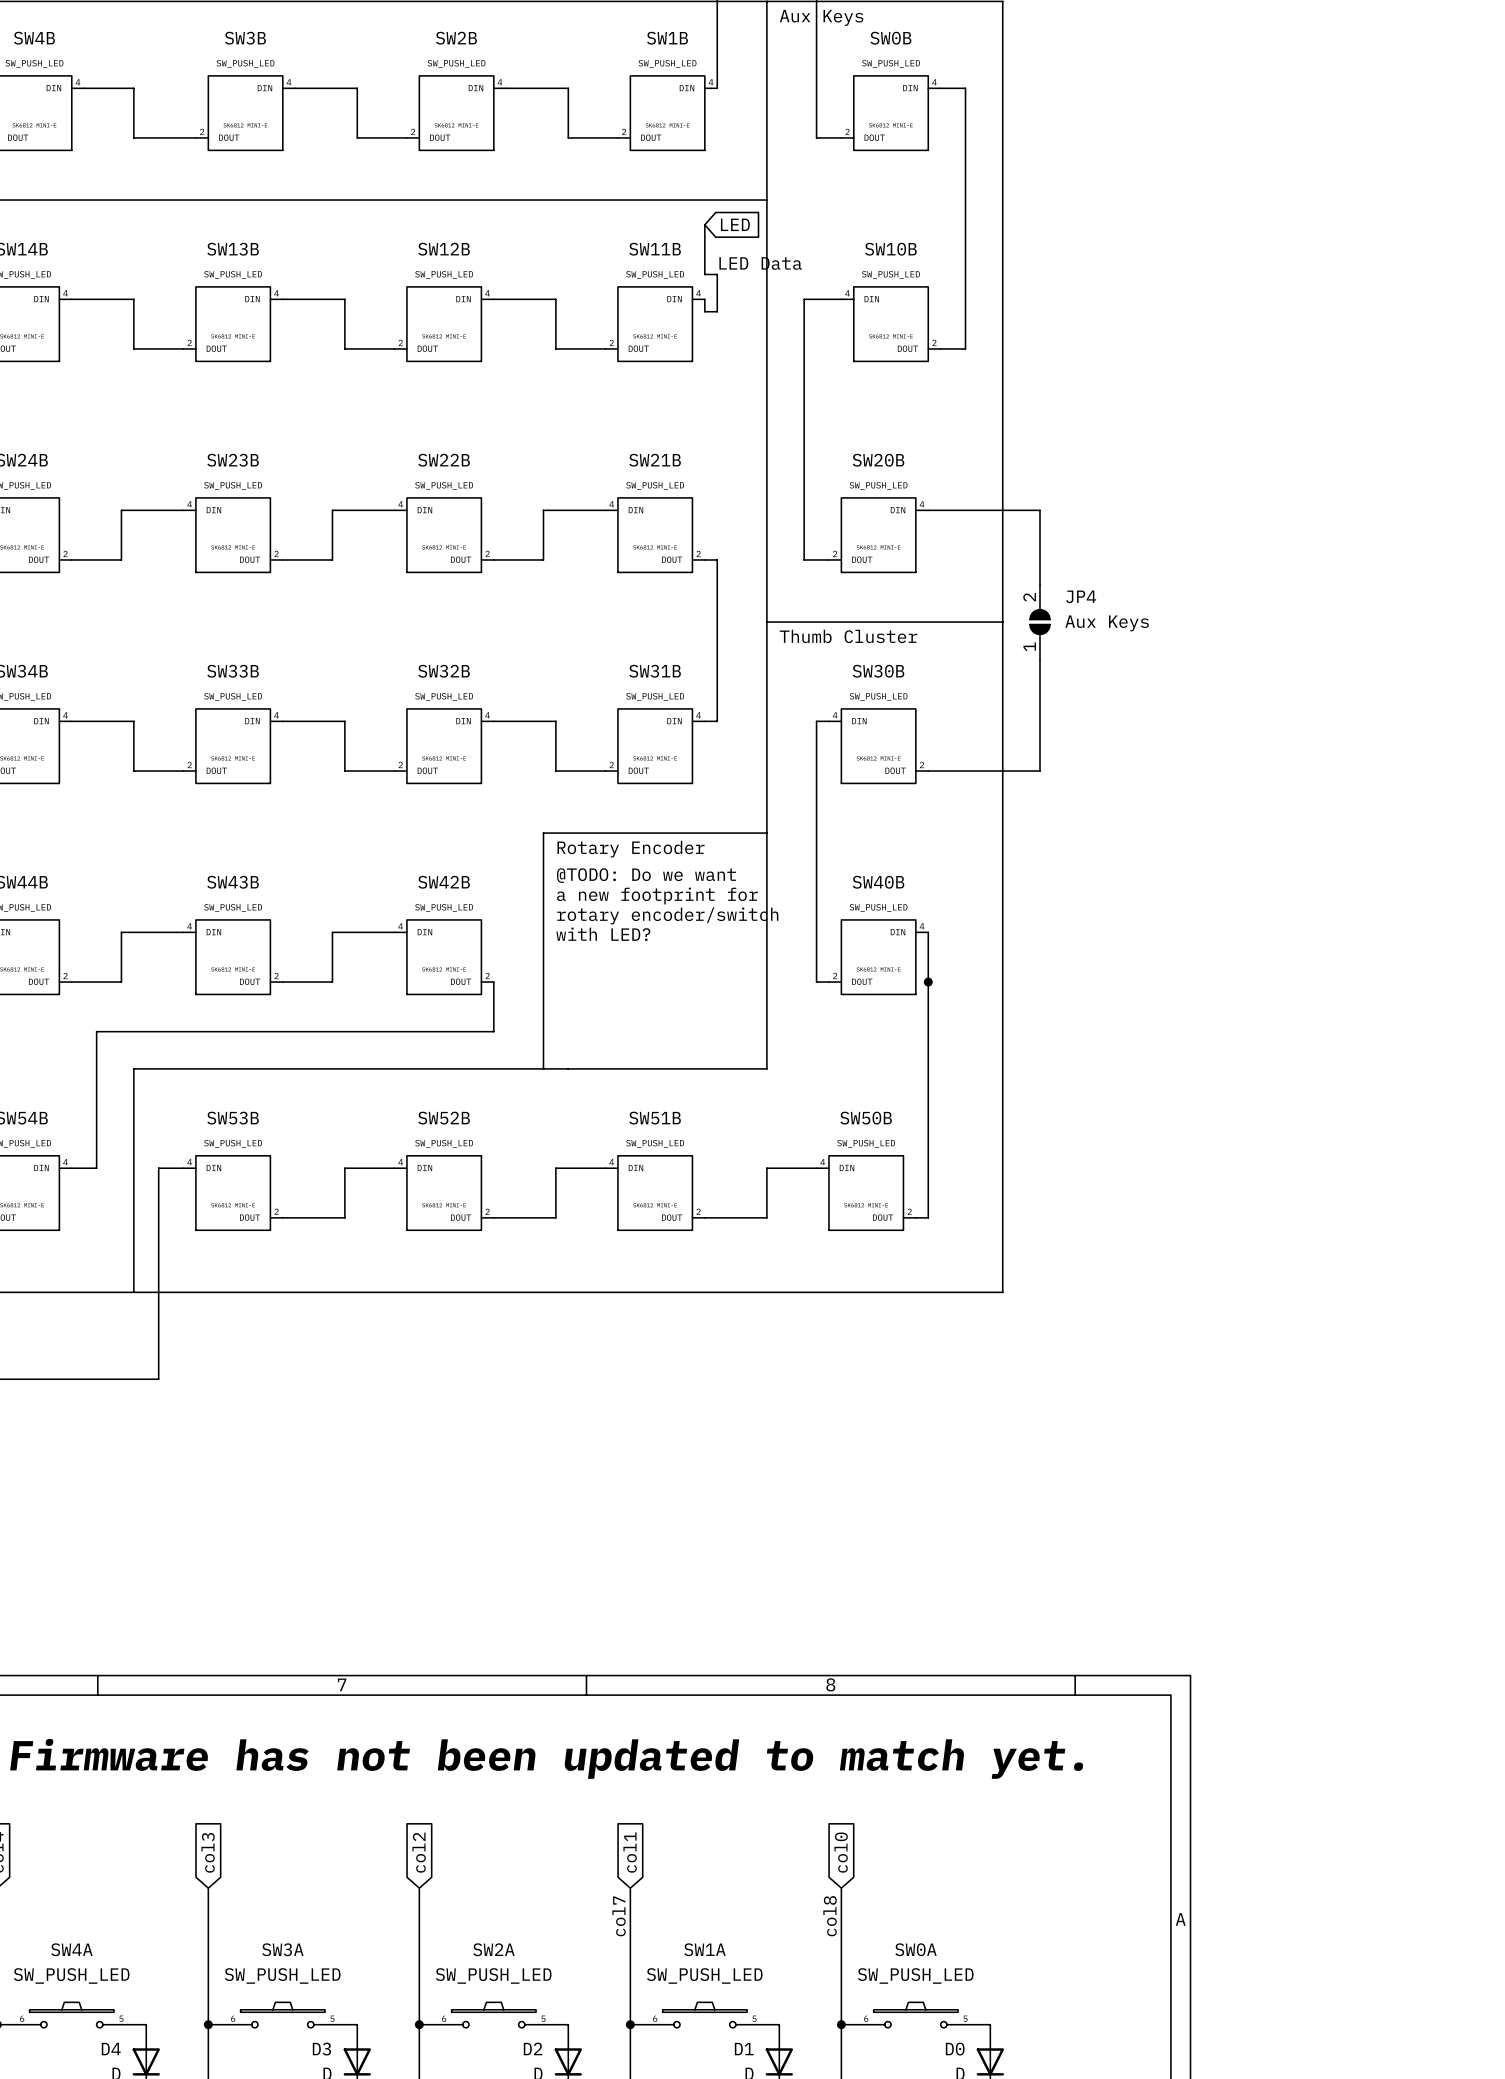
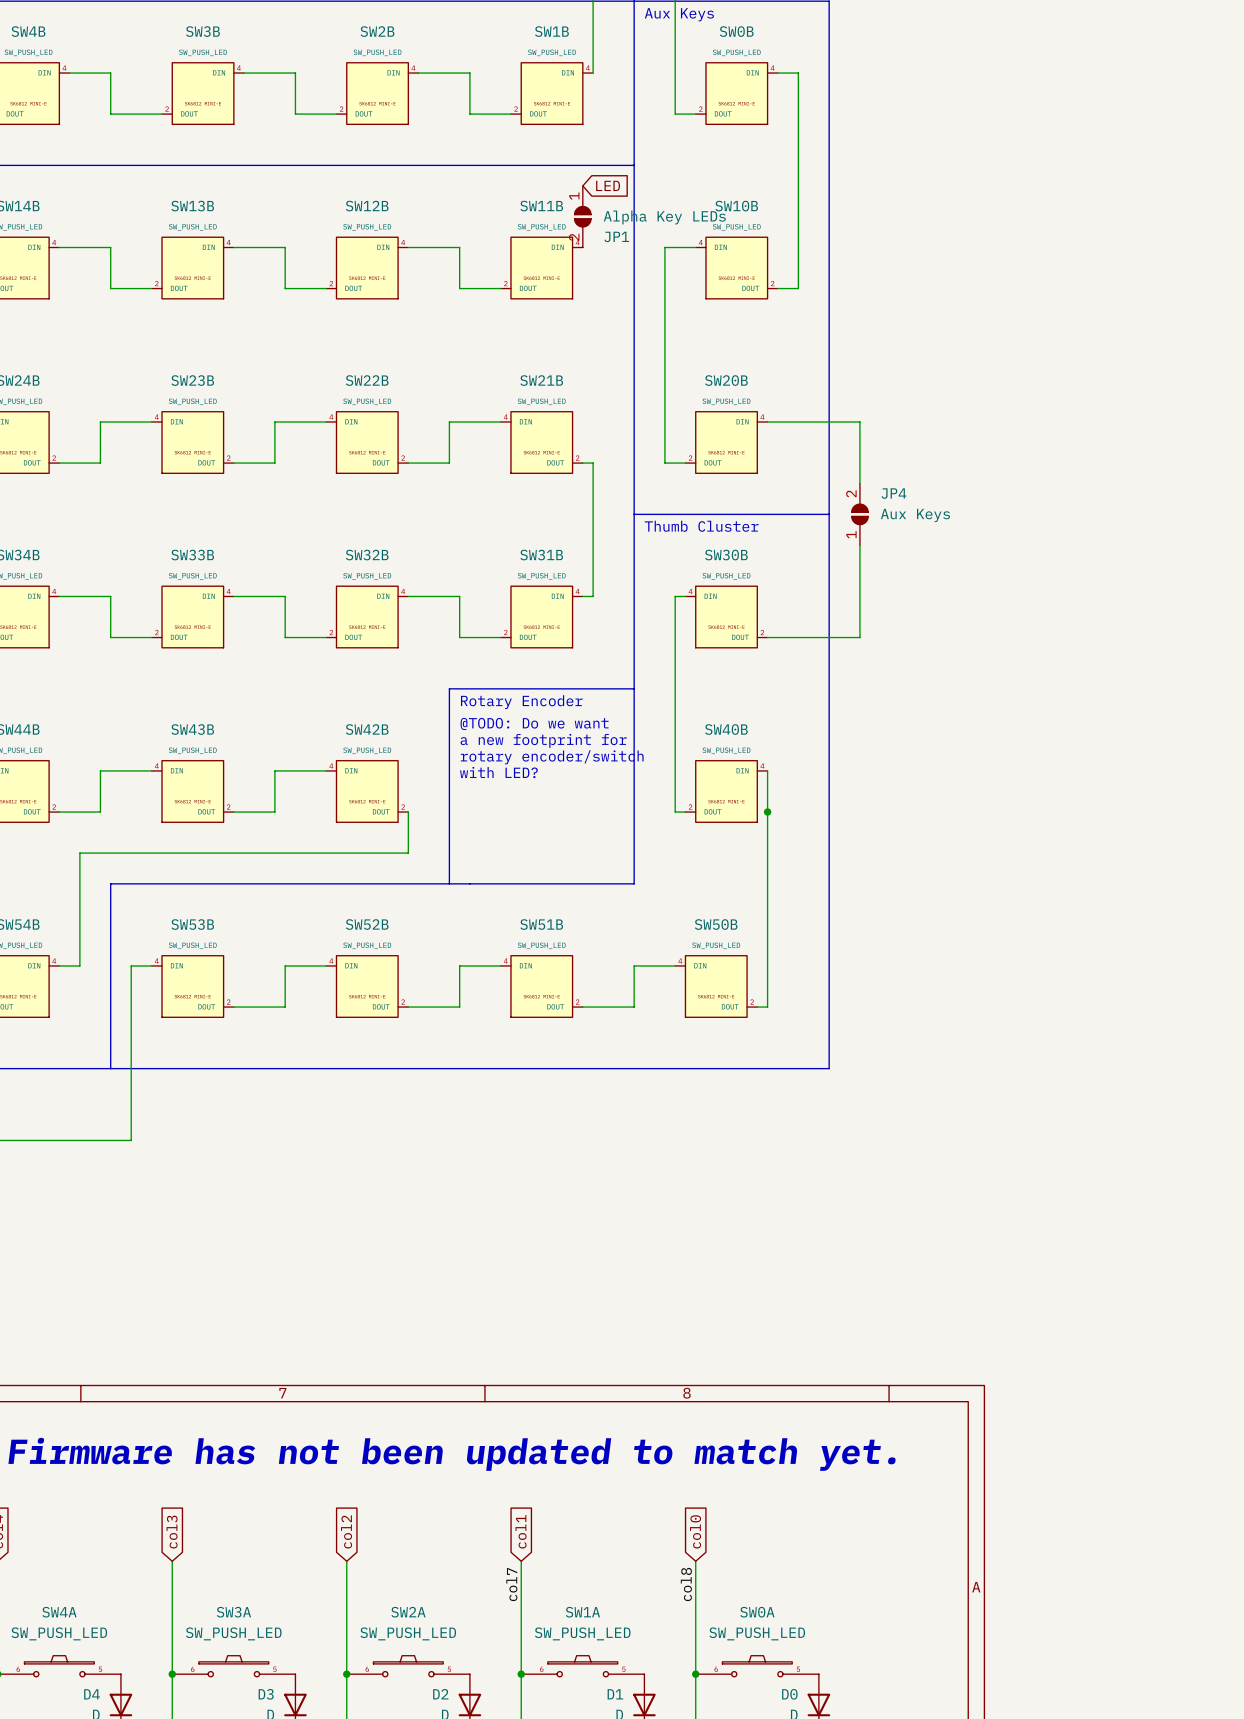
wire: (704, 224) (704, 274) (717, 274) (717, 311) (704, 311) (704, 299) -> none
JP1: none -> Alpha Key LEDs (582, 216)
label: LED Data (760, 263) -> none

